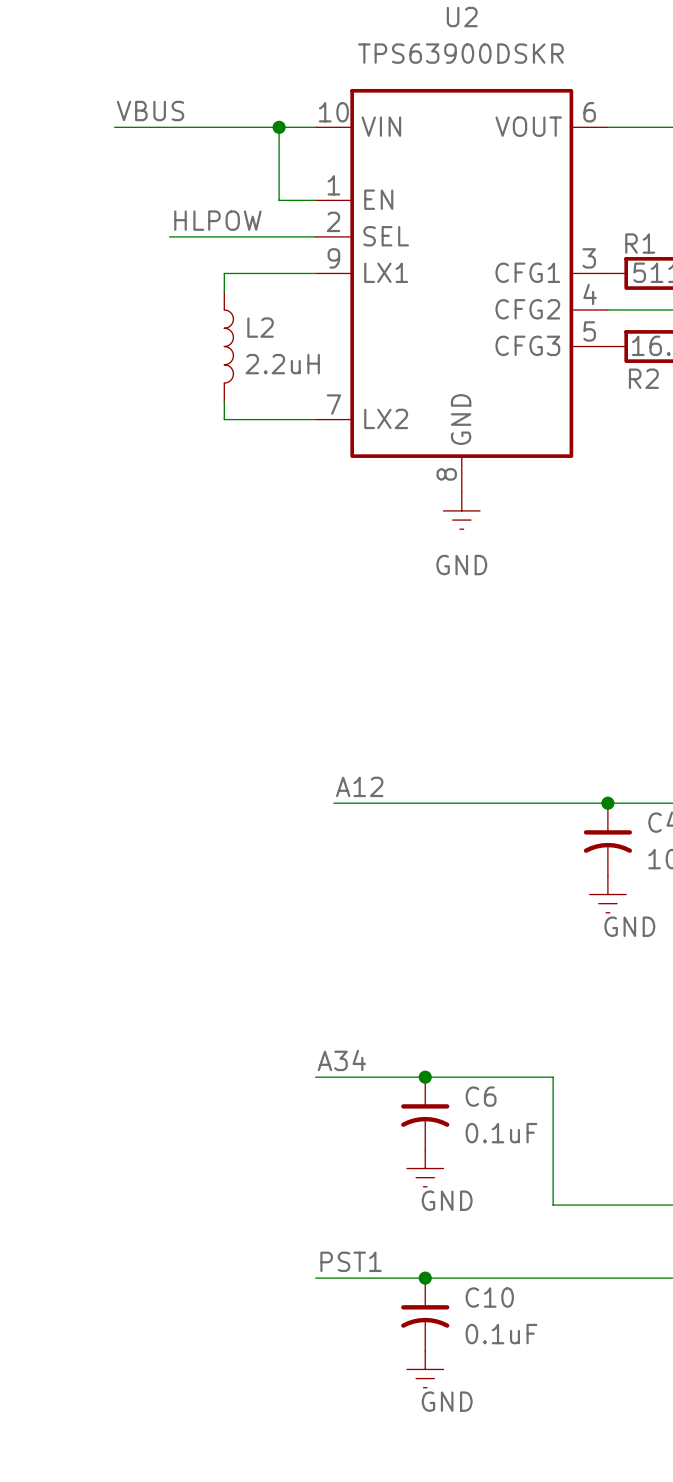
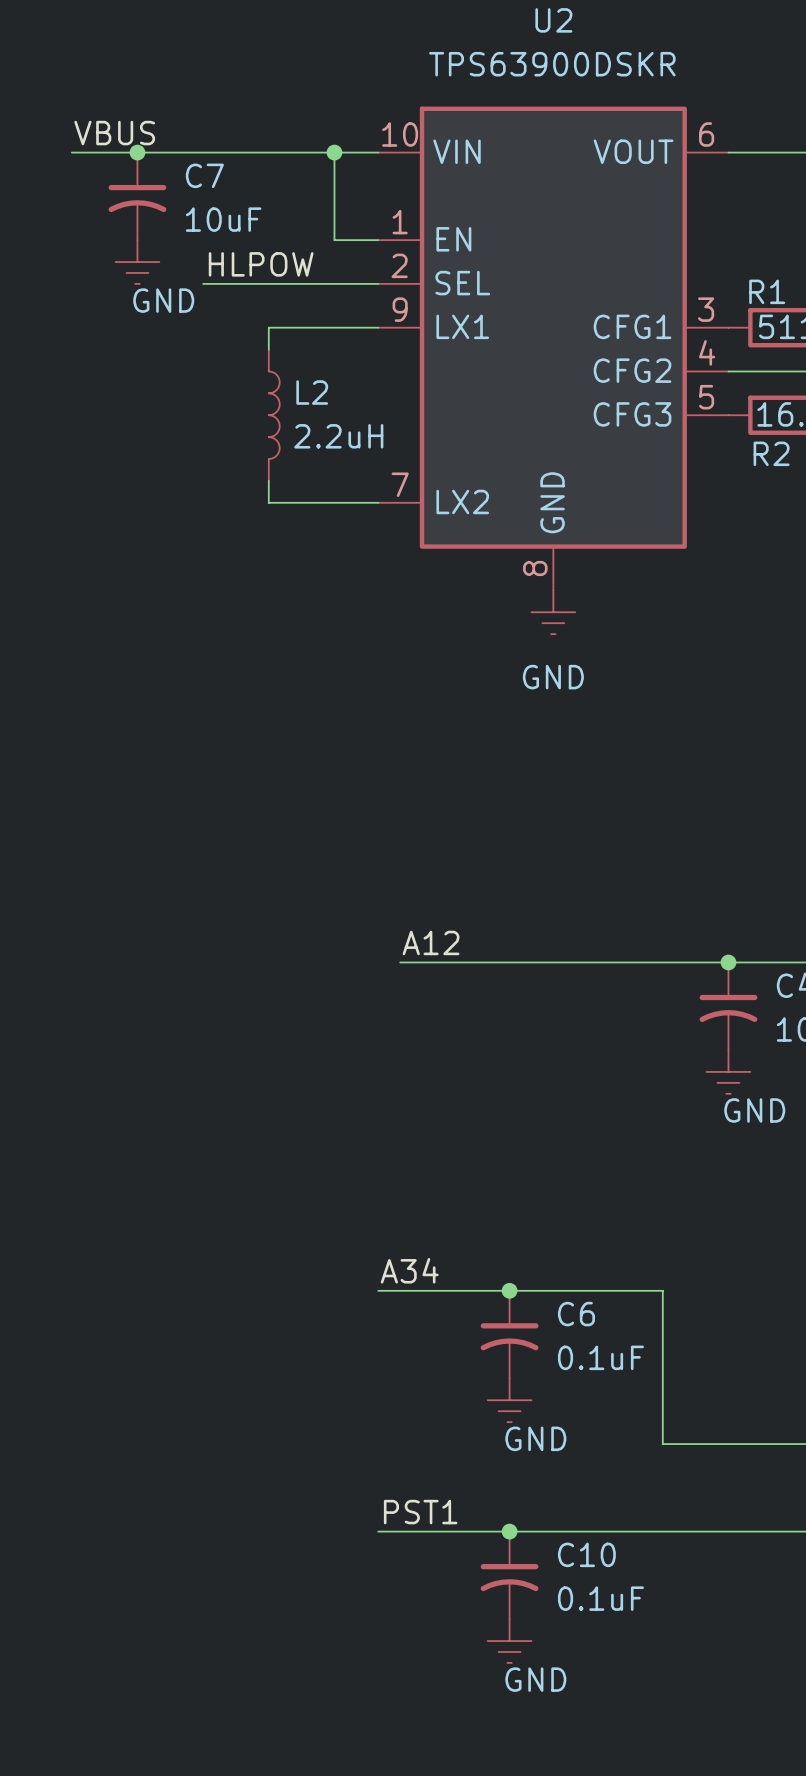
label position: VBUS (150, 111) -> VBUS (114, 133)
wire: none -> (71, 152) (137, 152)
junction: none -> (137, 152)
C7: none -> 10uF (137, 196)
power symbol: none -> GND (137, 262)

